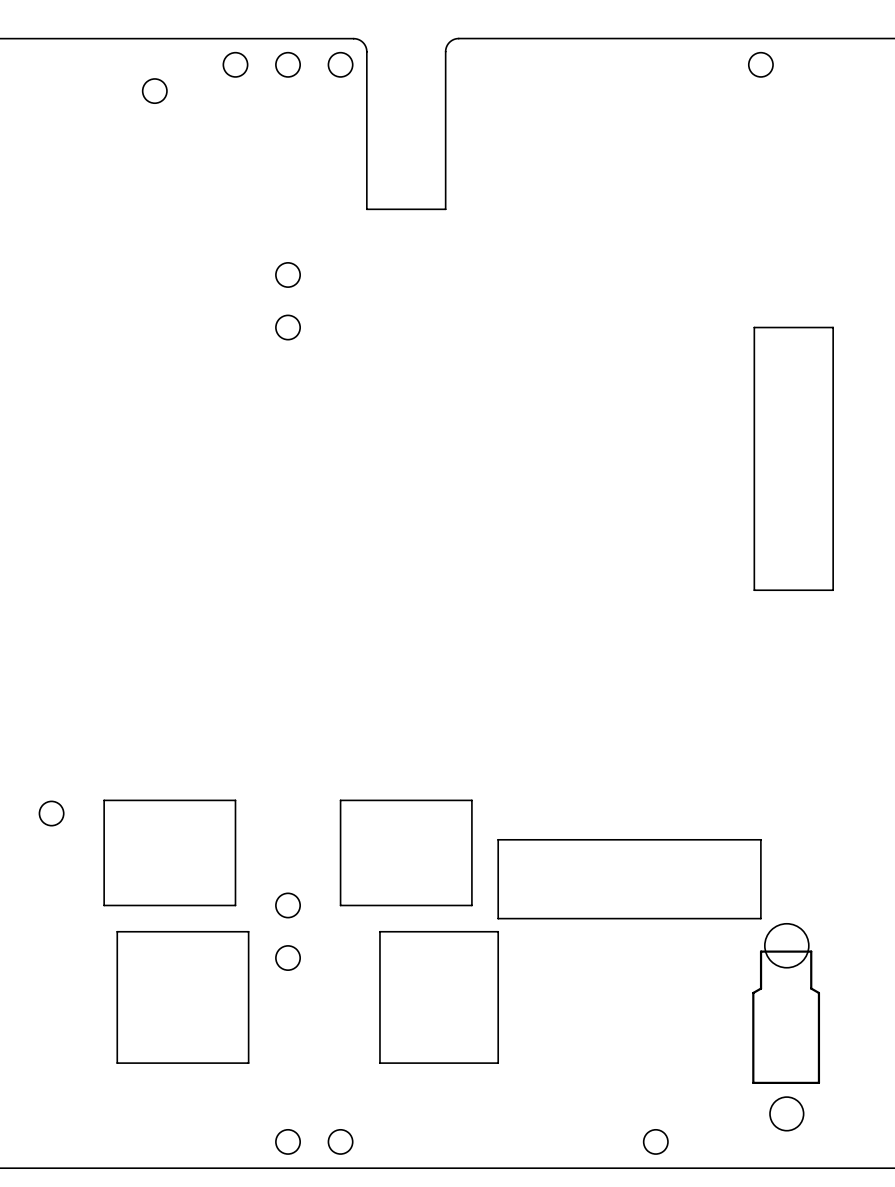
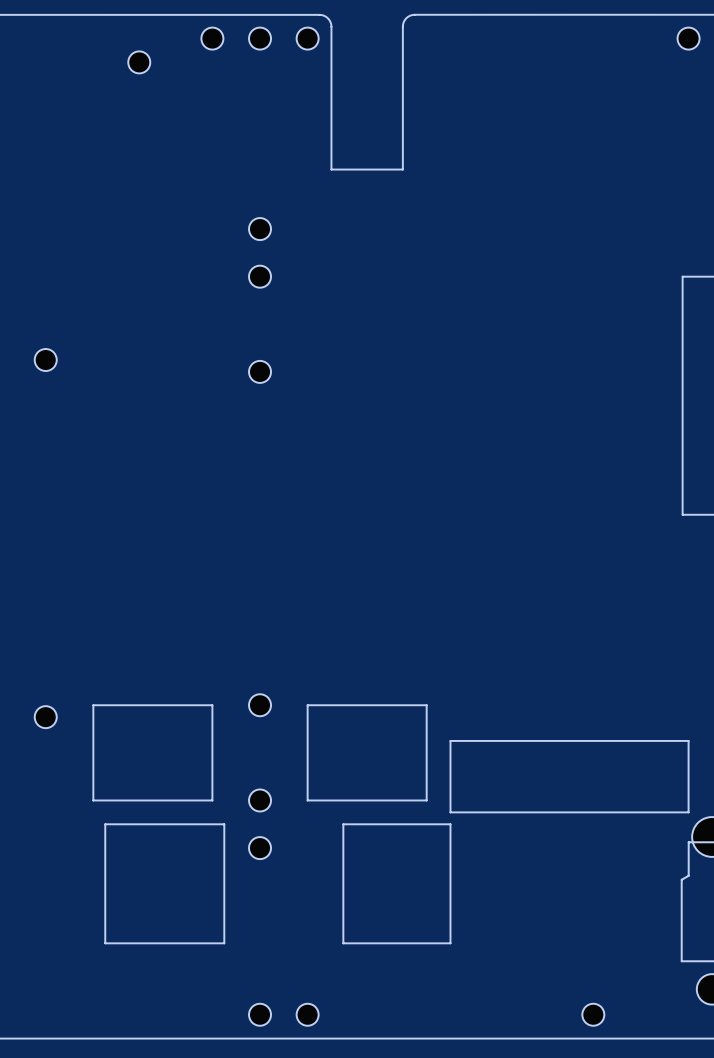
part: none -> (45, 360)
part: none -> (260, 371)
part: none -> (260, 705)

